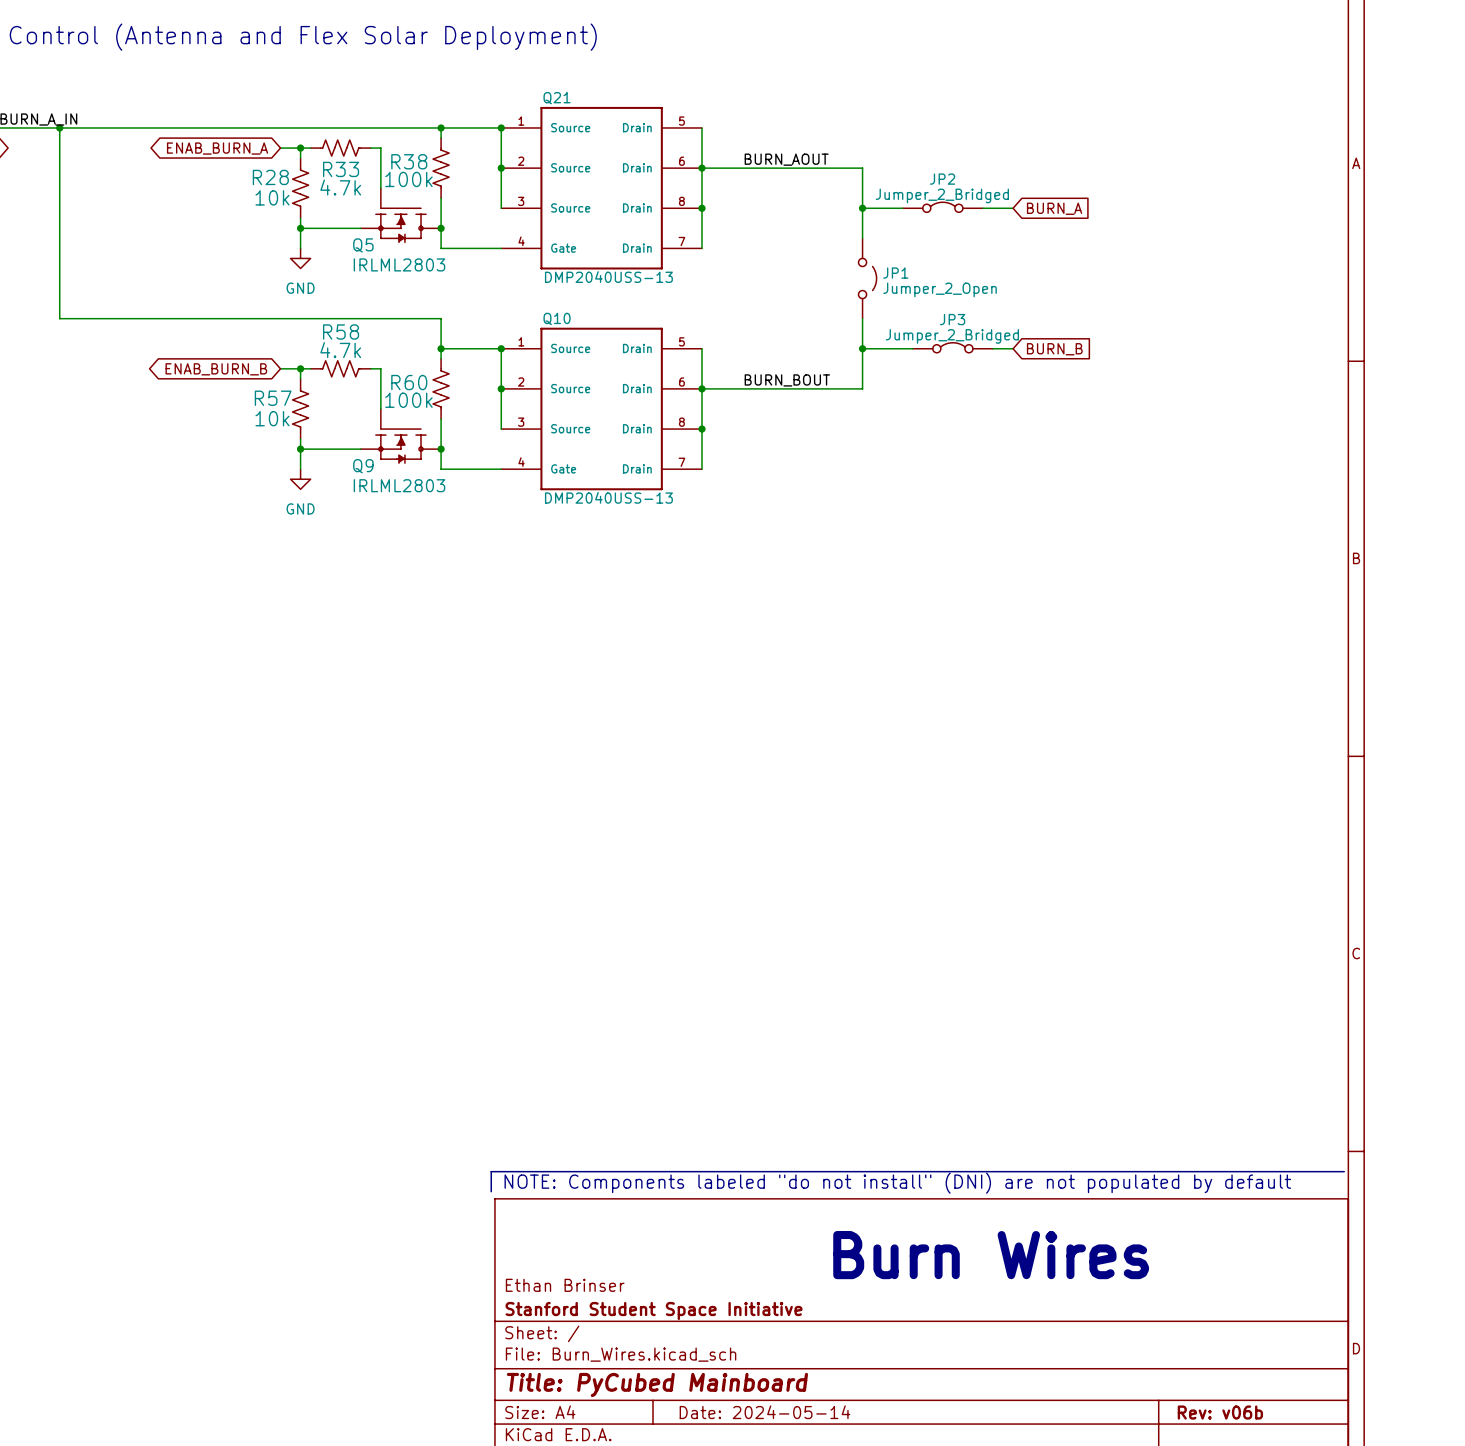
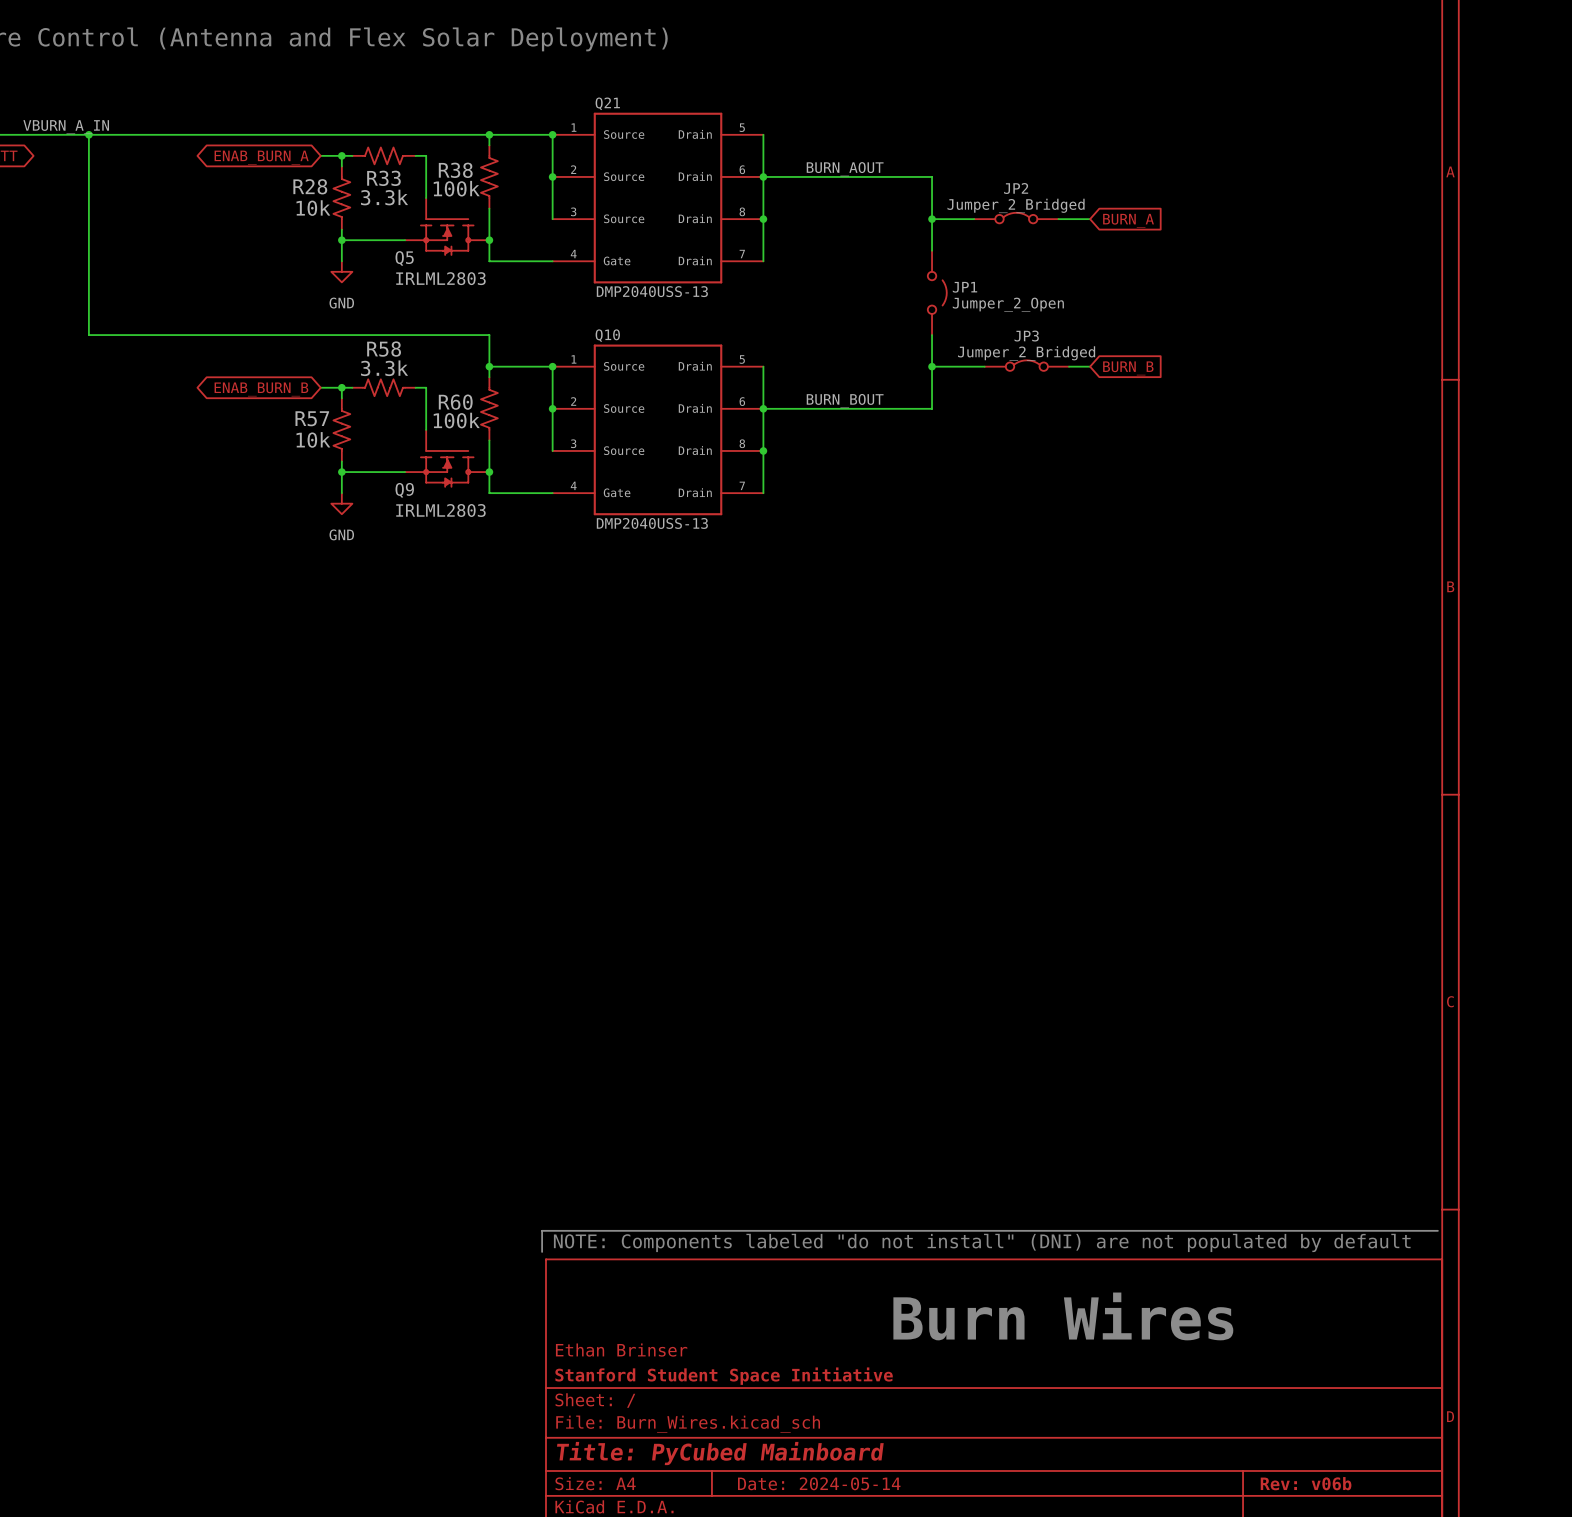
R33 value: 4.7k (340, 187) -> 3.3k (384, 197)
R58 value: 4.7k (340, 350) -> 3.3k (384, 368)

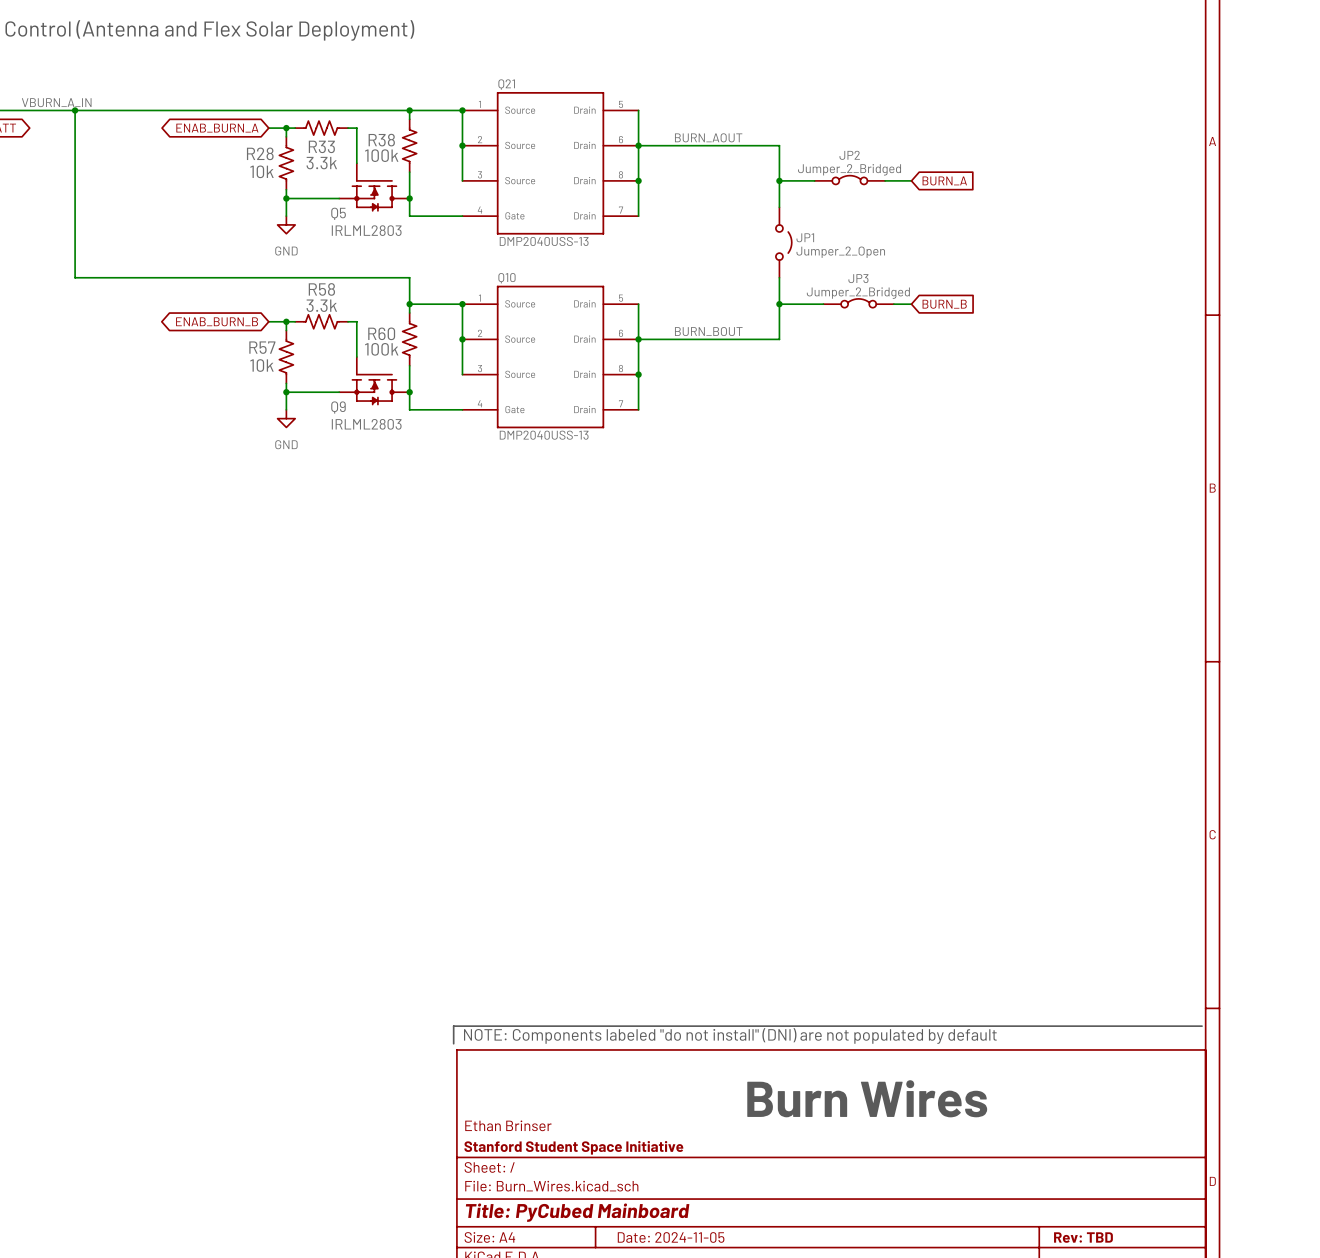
title block: Date: 2024-05-14 (819, 1483) -> Date: 2024-11-05 (671, 1237)
title block: Rev: v06b (1306, 1483) -> Rev: TBD (1083, 1237)

